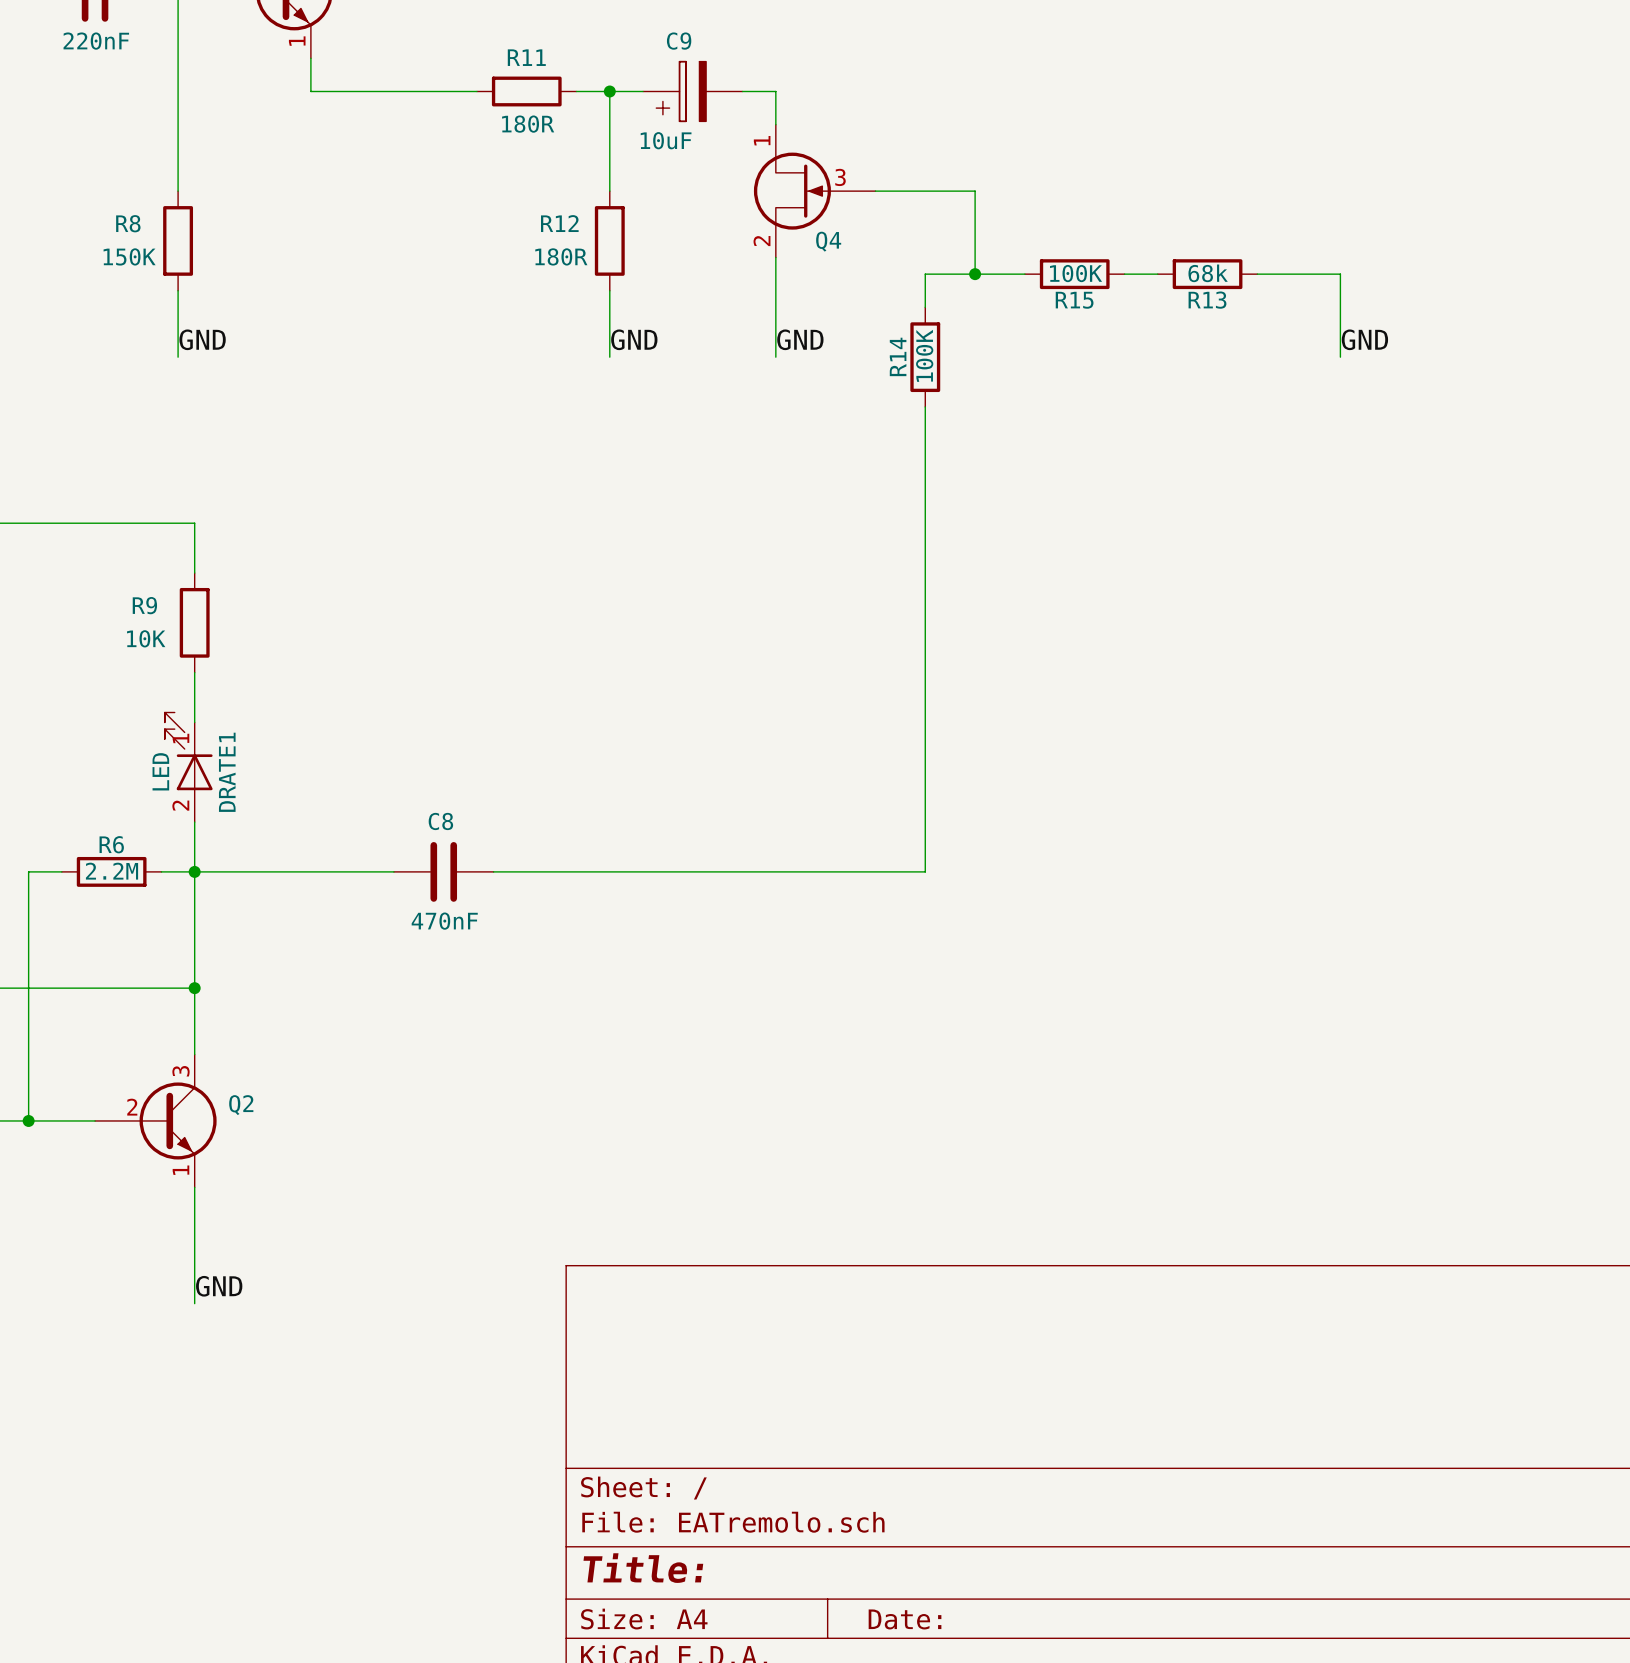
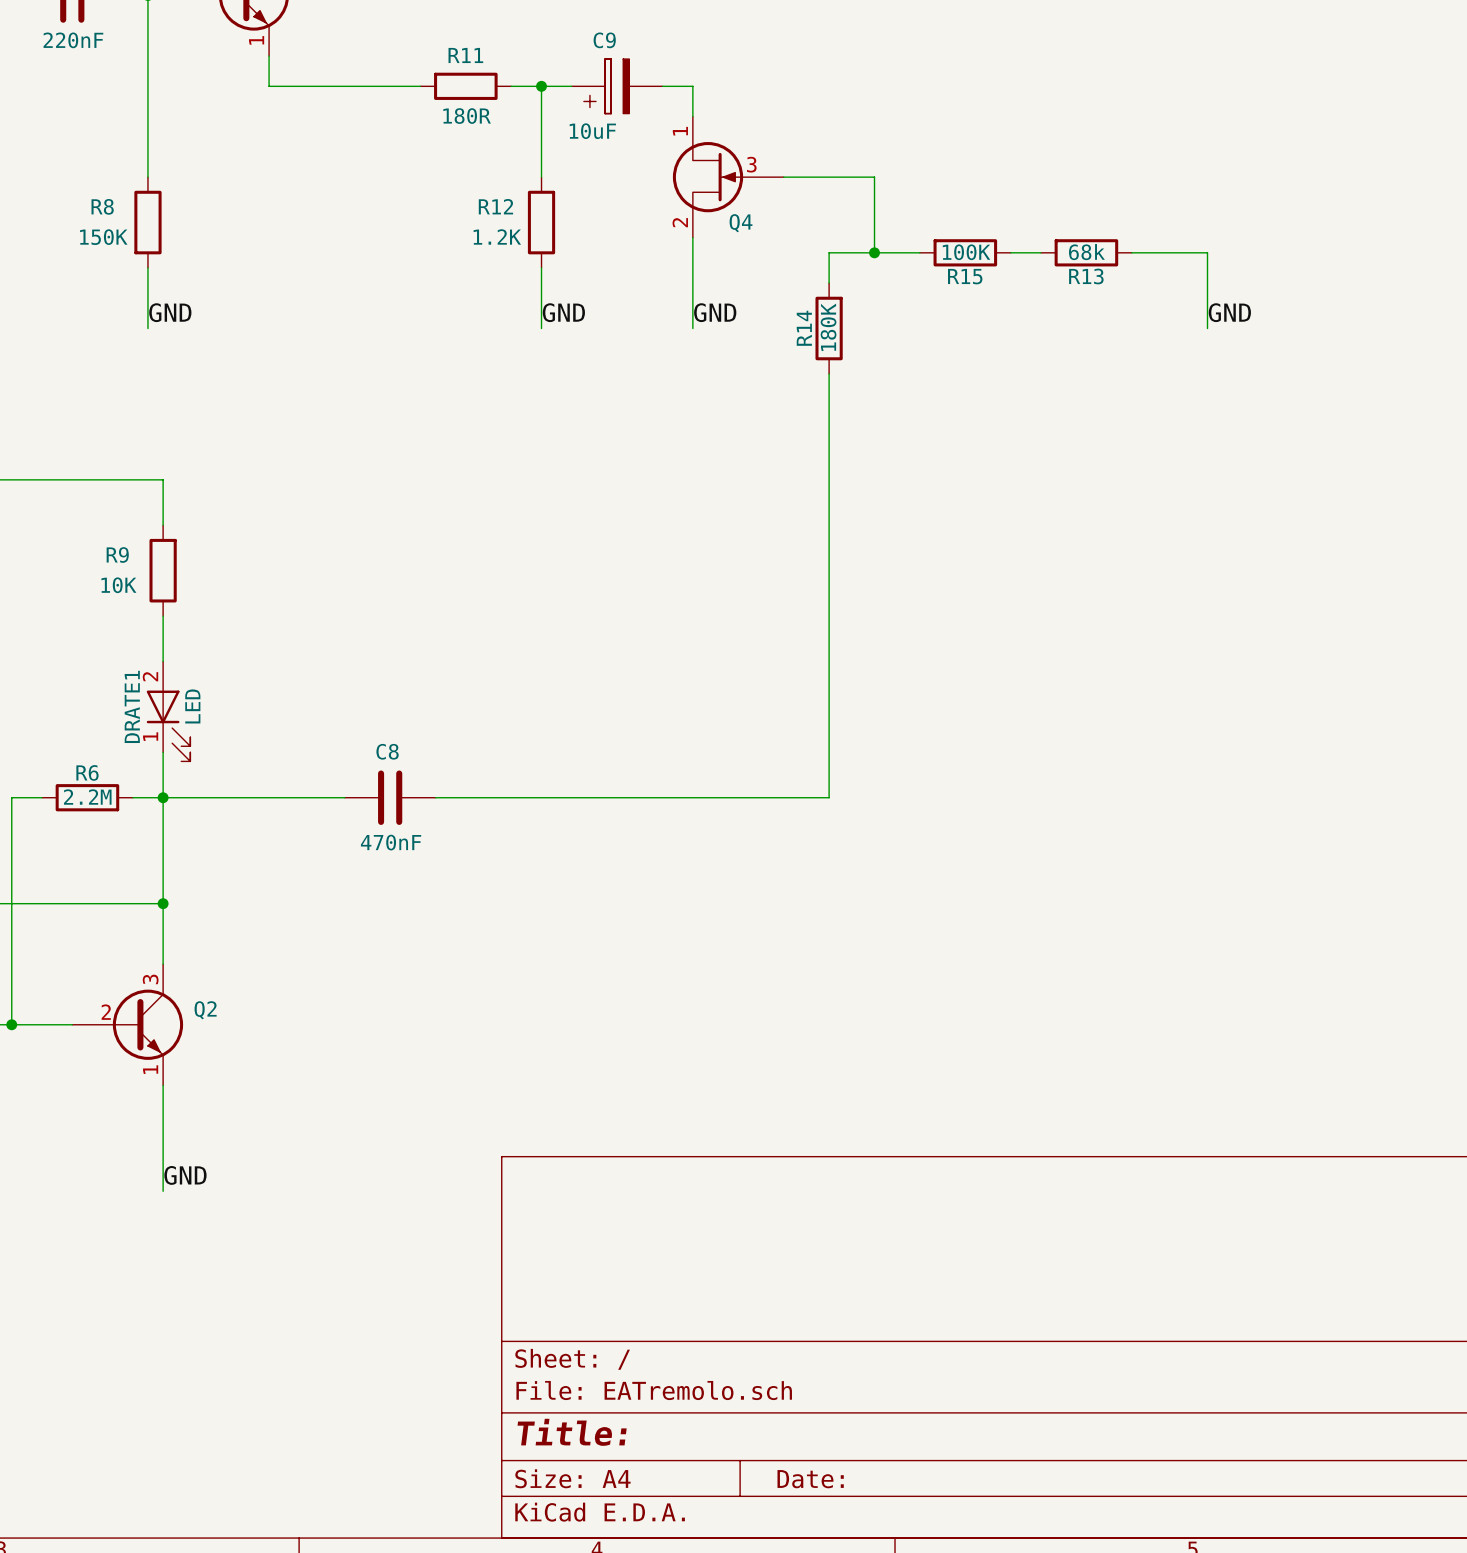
R12 value: 180R (561, 256) -> 1.2K (497, 236)
R14 value: 100K (924, 355) -> 180K (828, 327)
DRATE1 rotation: 0° (188, 751) -> 180° (168, 725)

